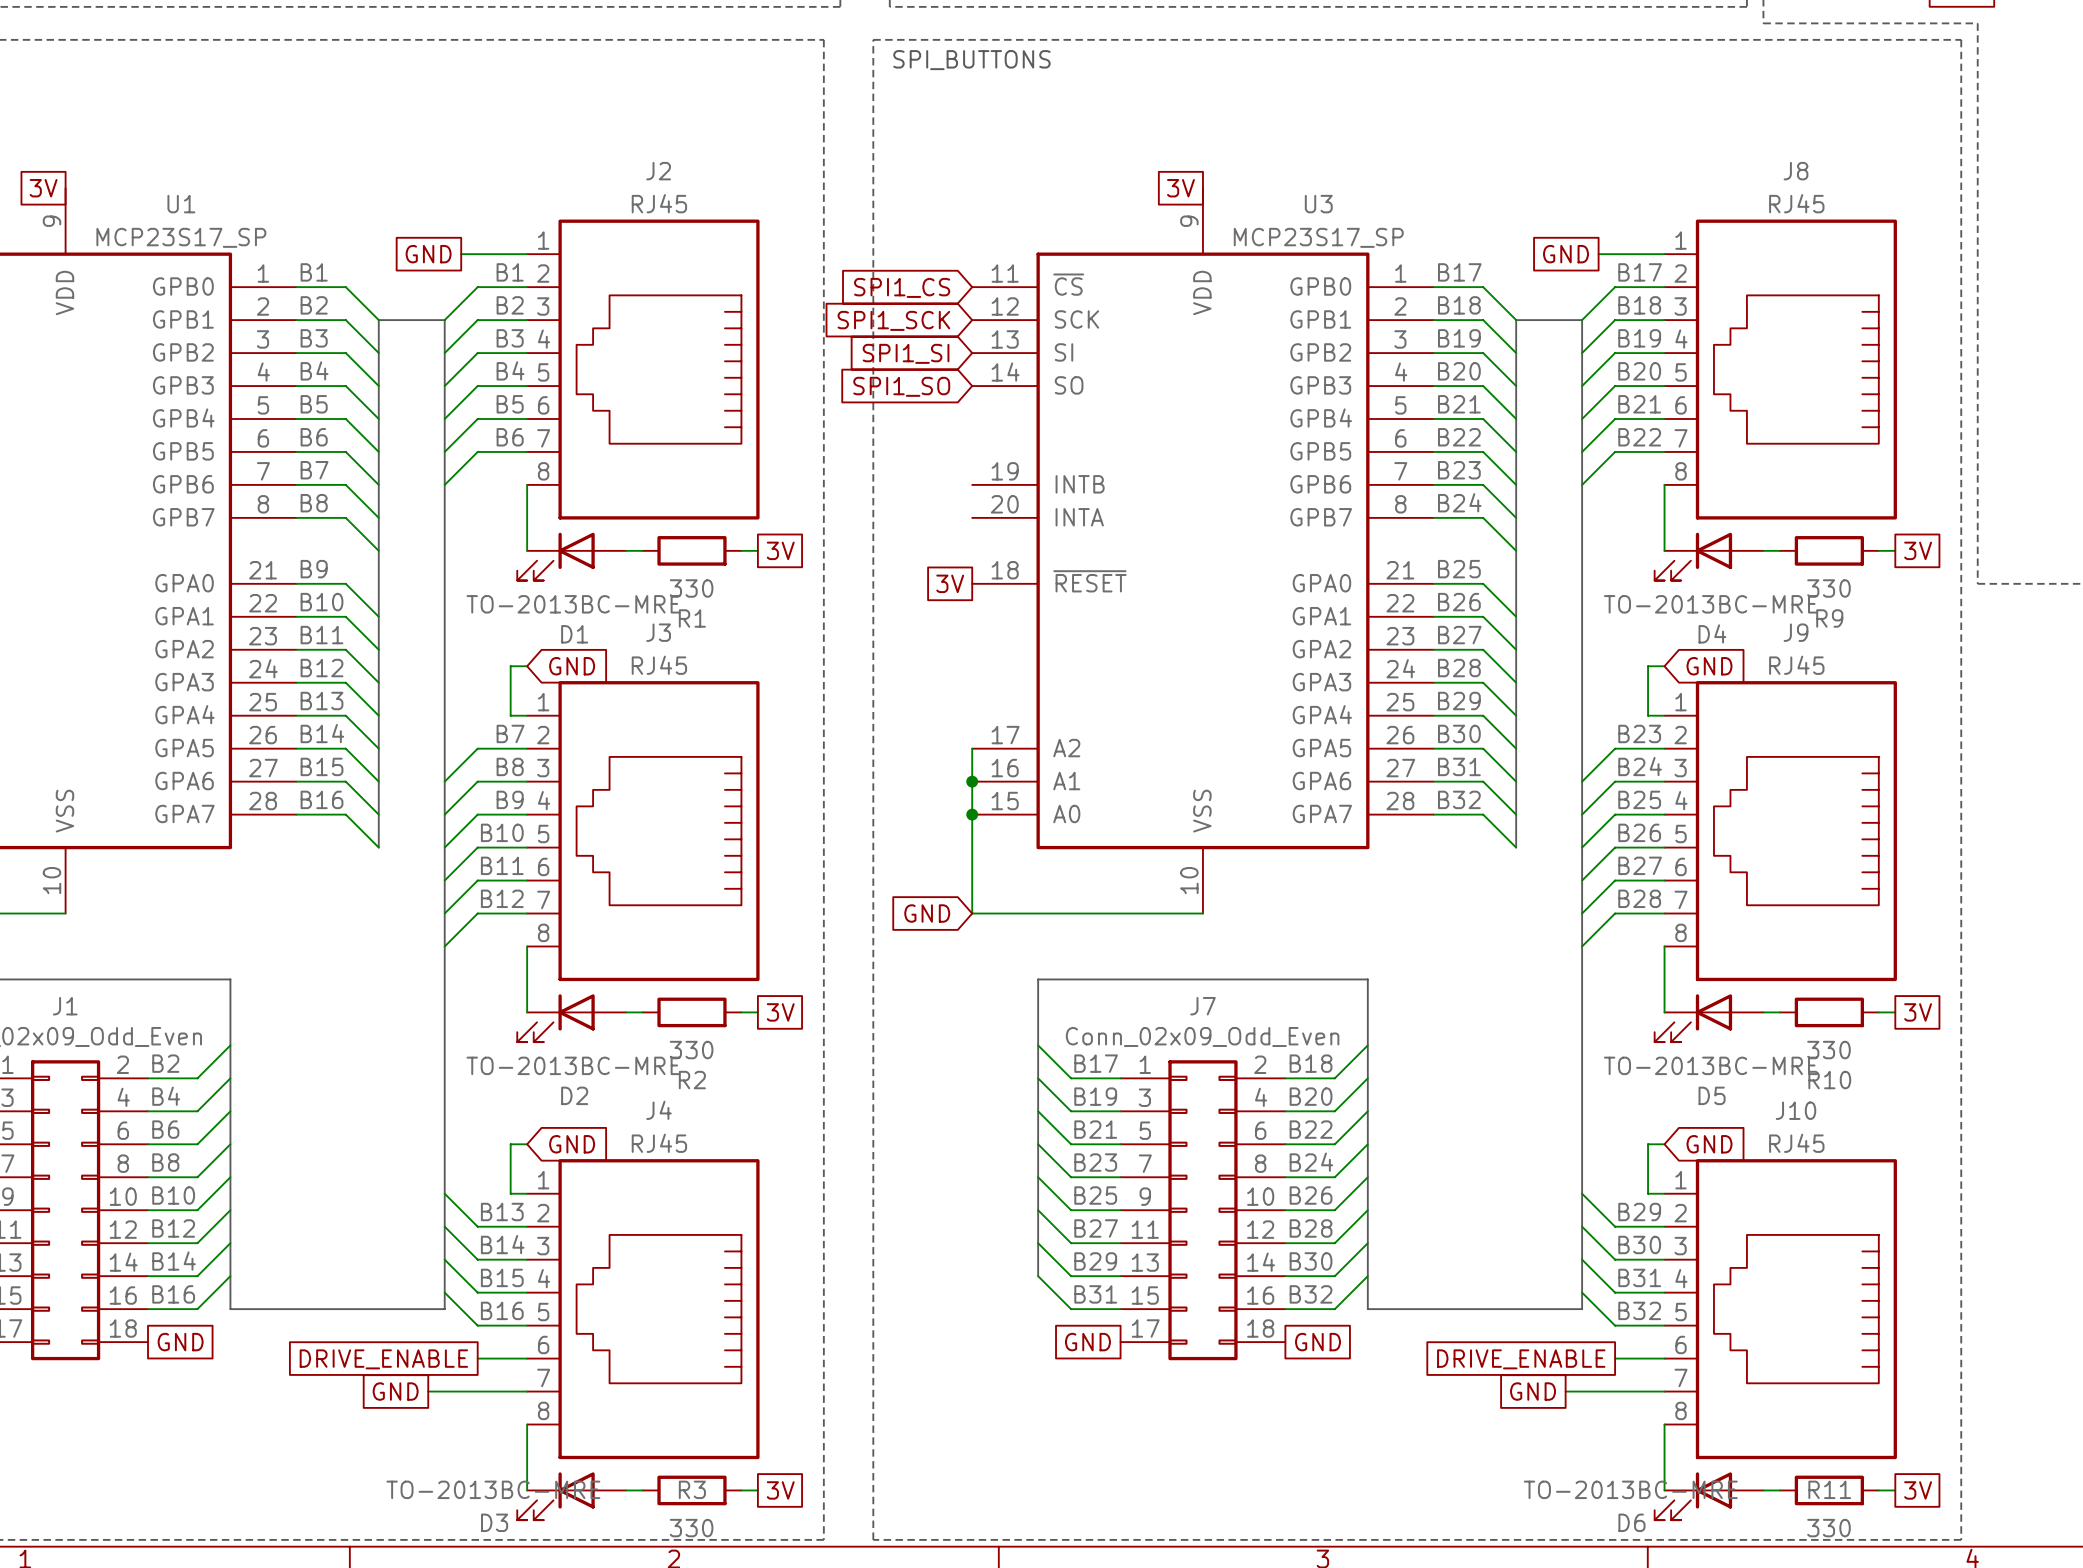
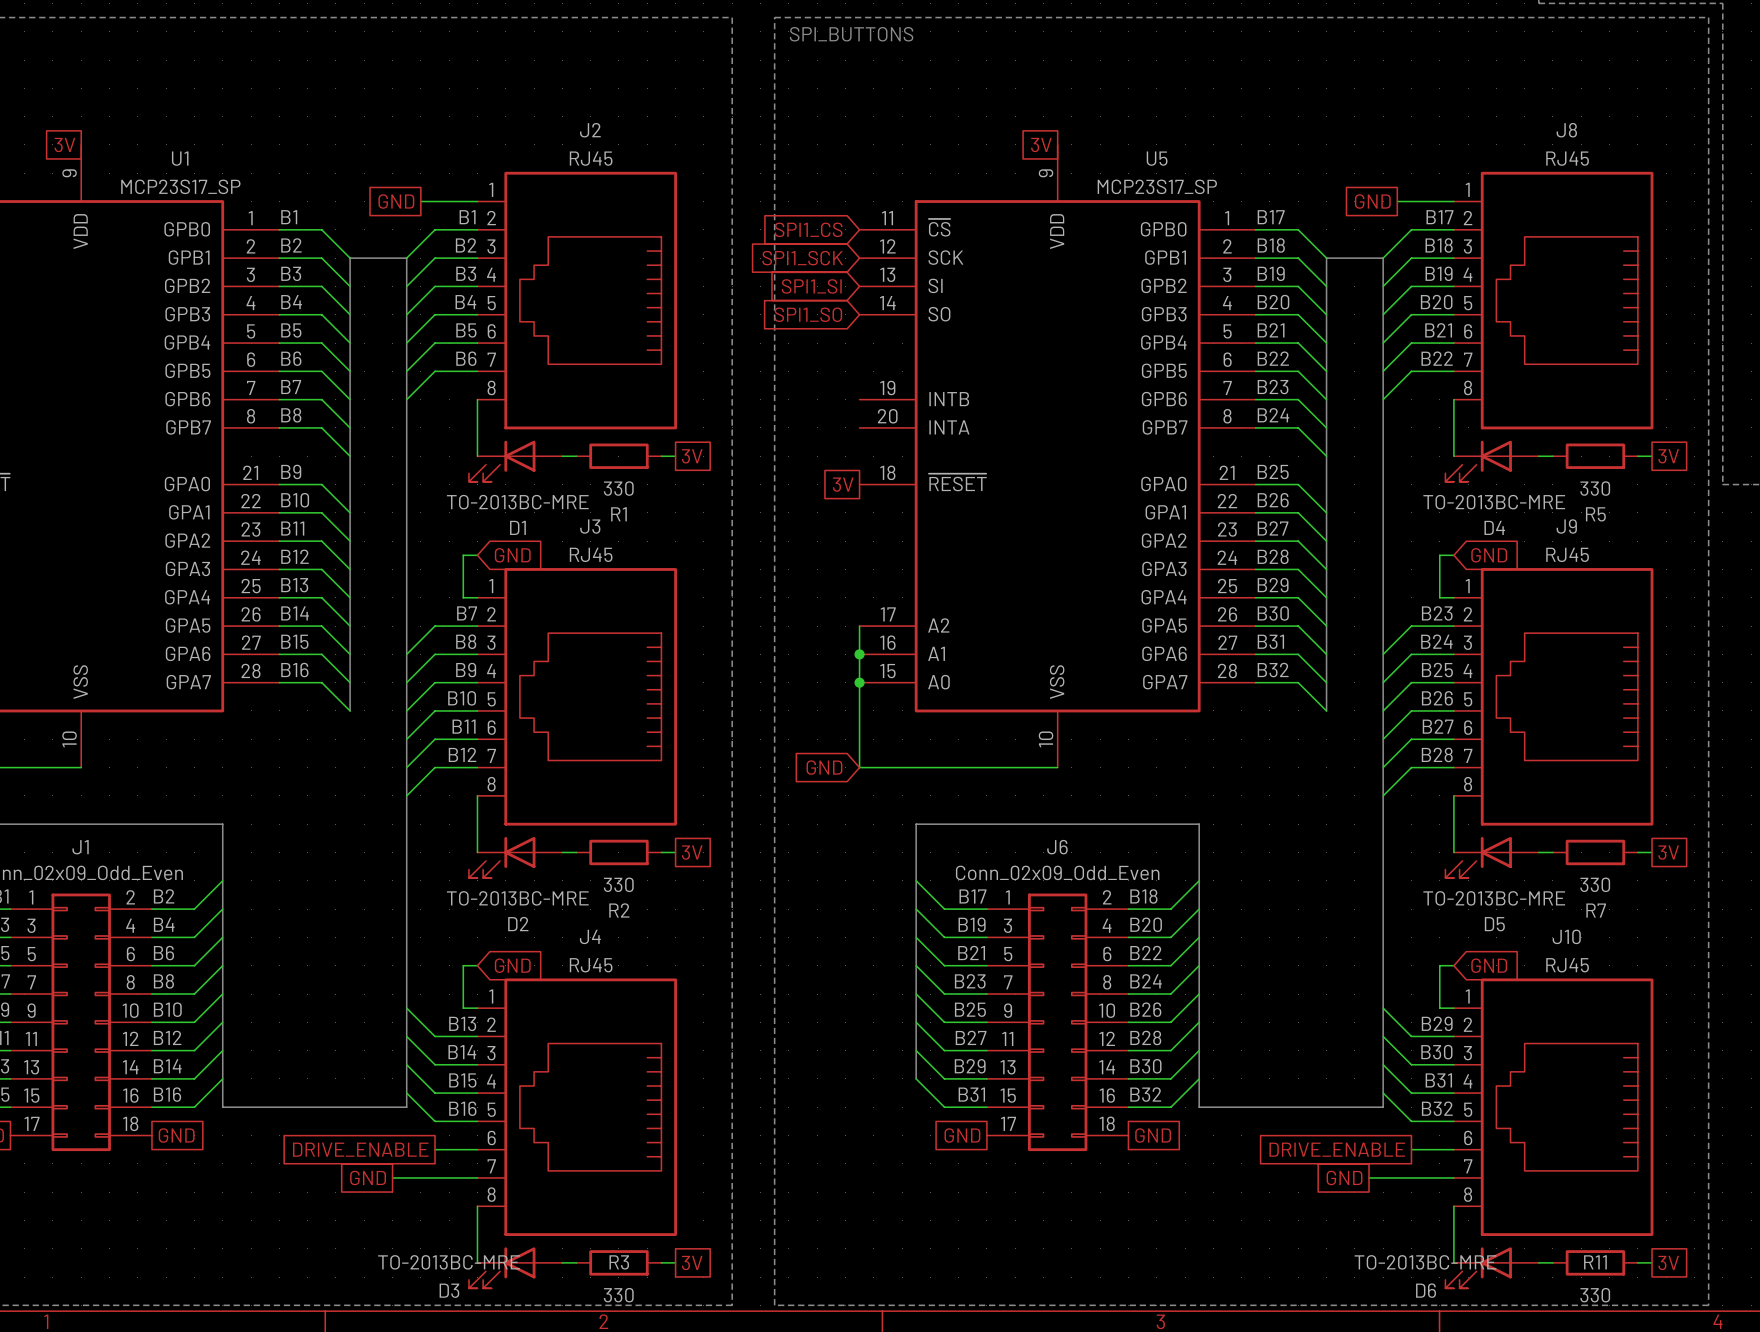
U3 name: U3 (1318, 204) -> U5 (1157, 158)
R9 name: R9 (1829, 618) -> R5 (1595, 514)
J7 name: J7 (1202, 1006) -> J6 (1057, 847)
R10 name: R10 (1829, 1080) -> R7 (1596, 910)

